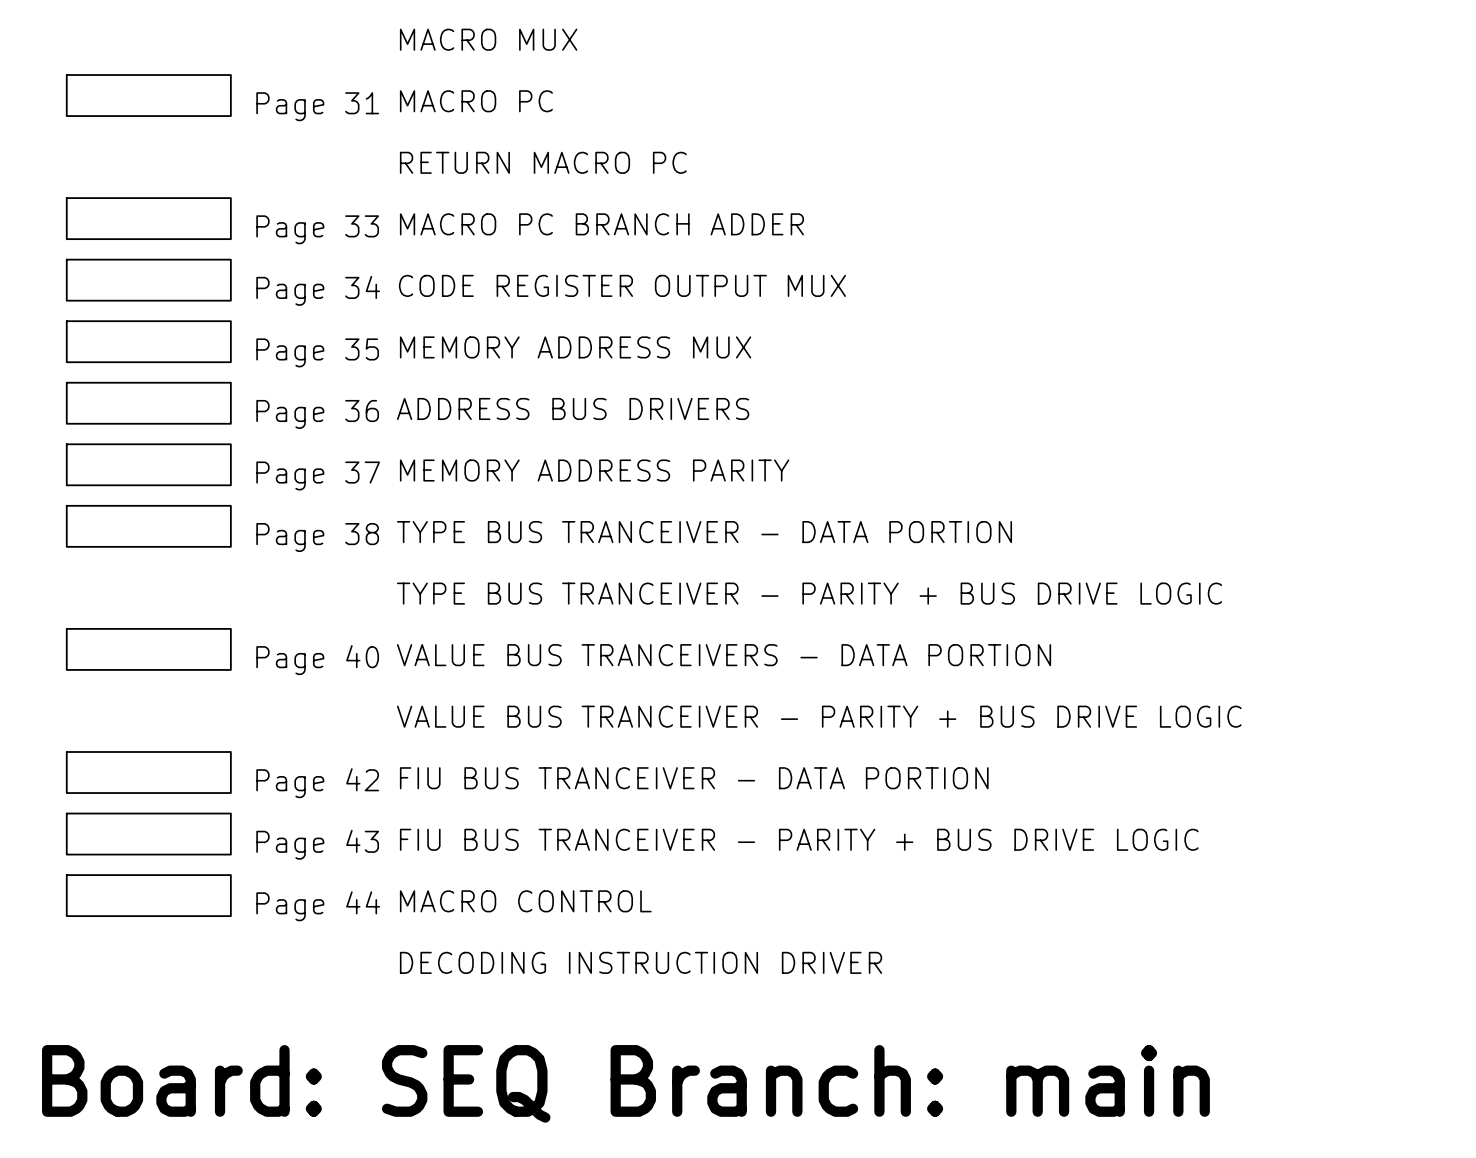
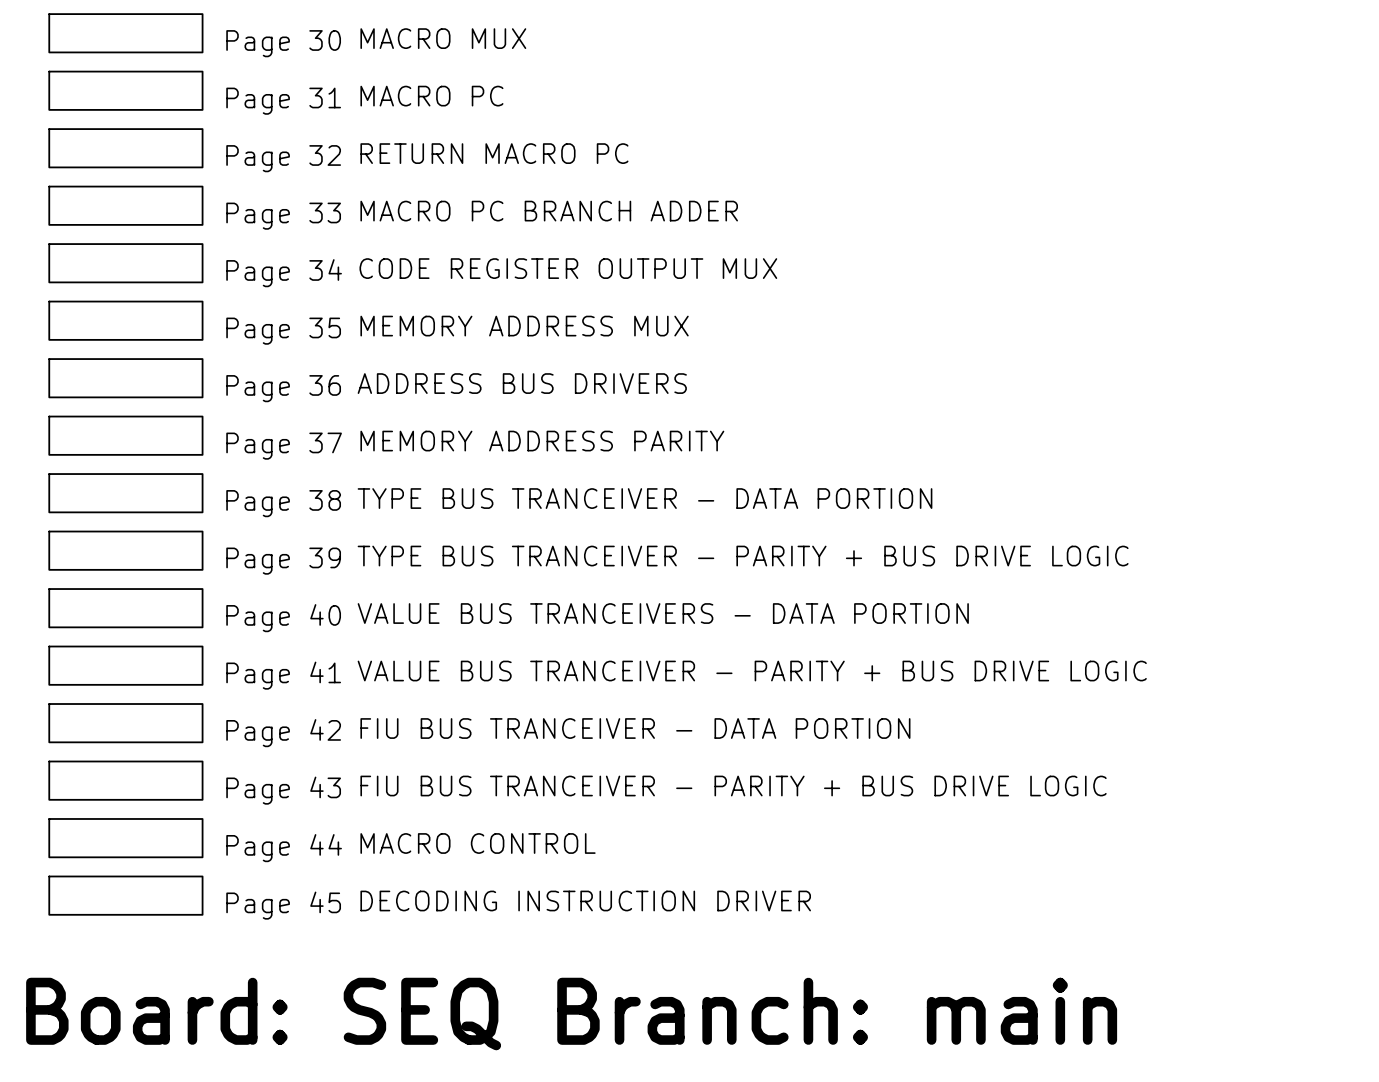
sheet Page 30: none -> (125, 33)
sheet Page 32: none -> (125, 148)
sheet Page 39: none -> (125, 550)
sheet Page 41: none -> (125, 665)
sheet Page 45: none -> (125, 895)

